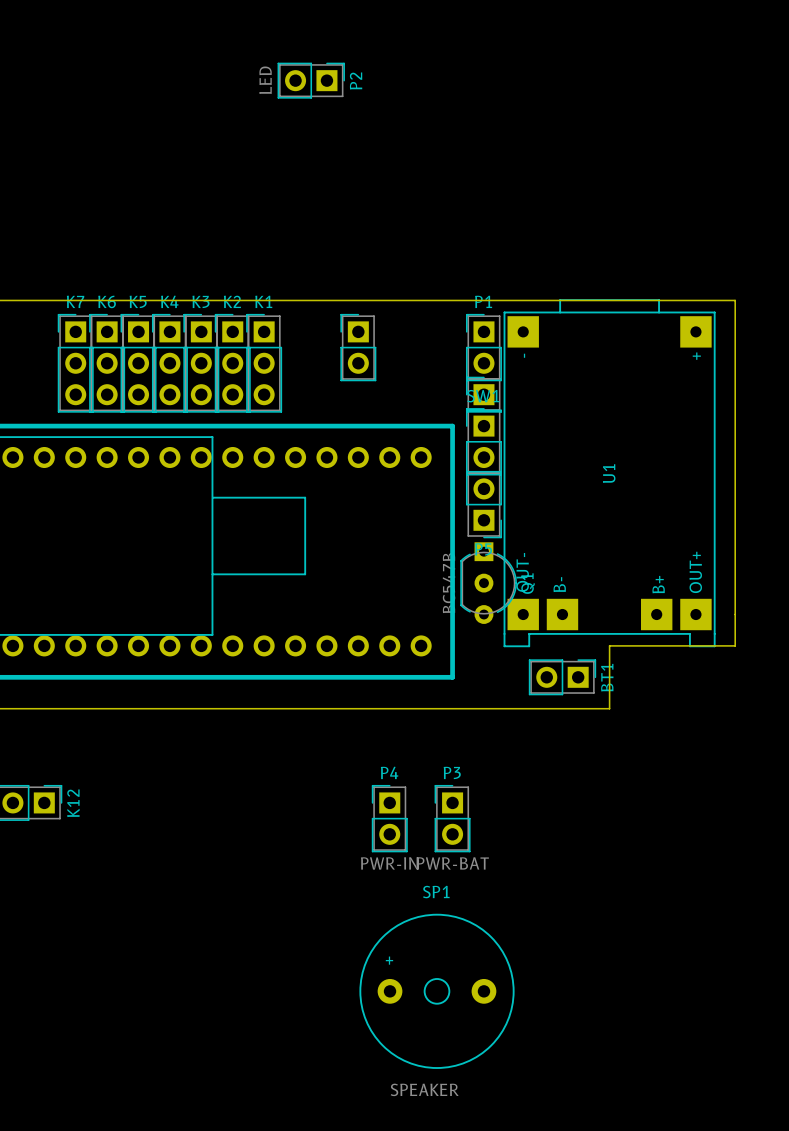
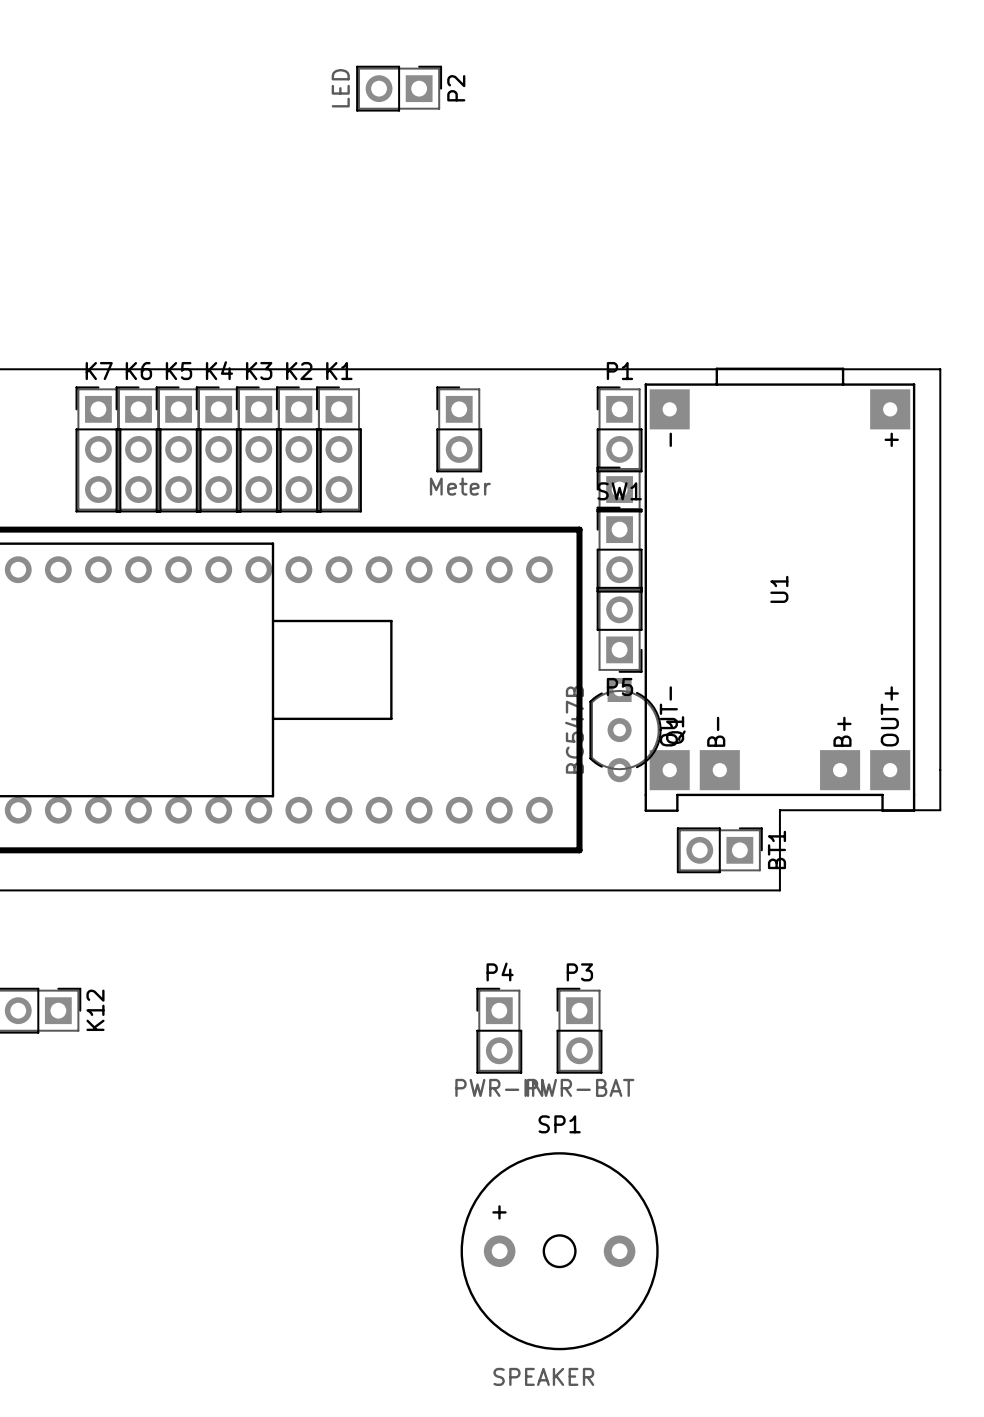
part value: none -> Meter (460, 486)

